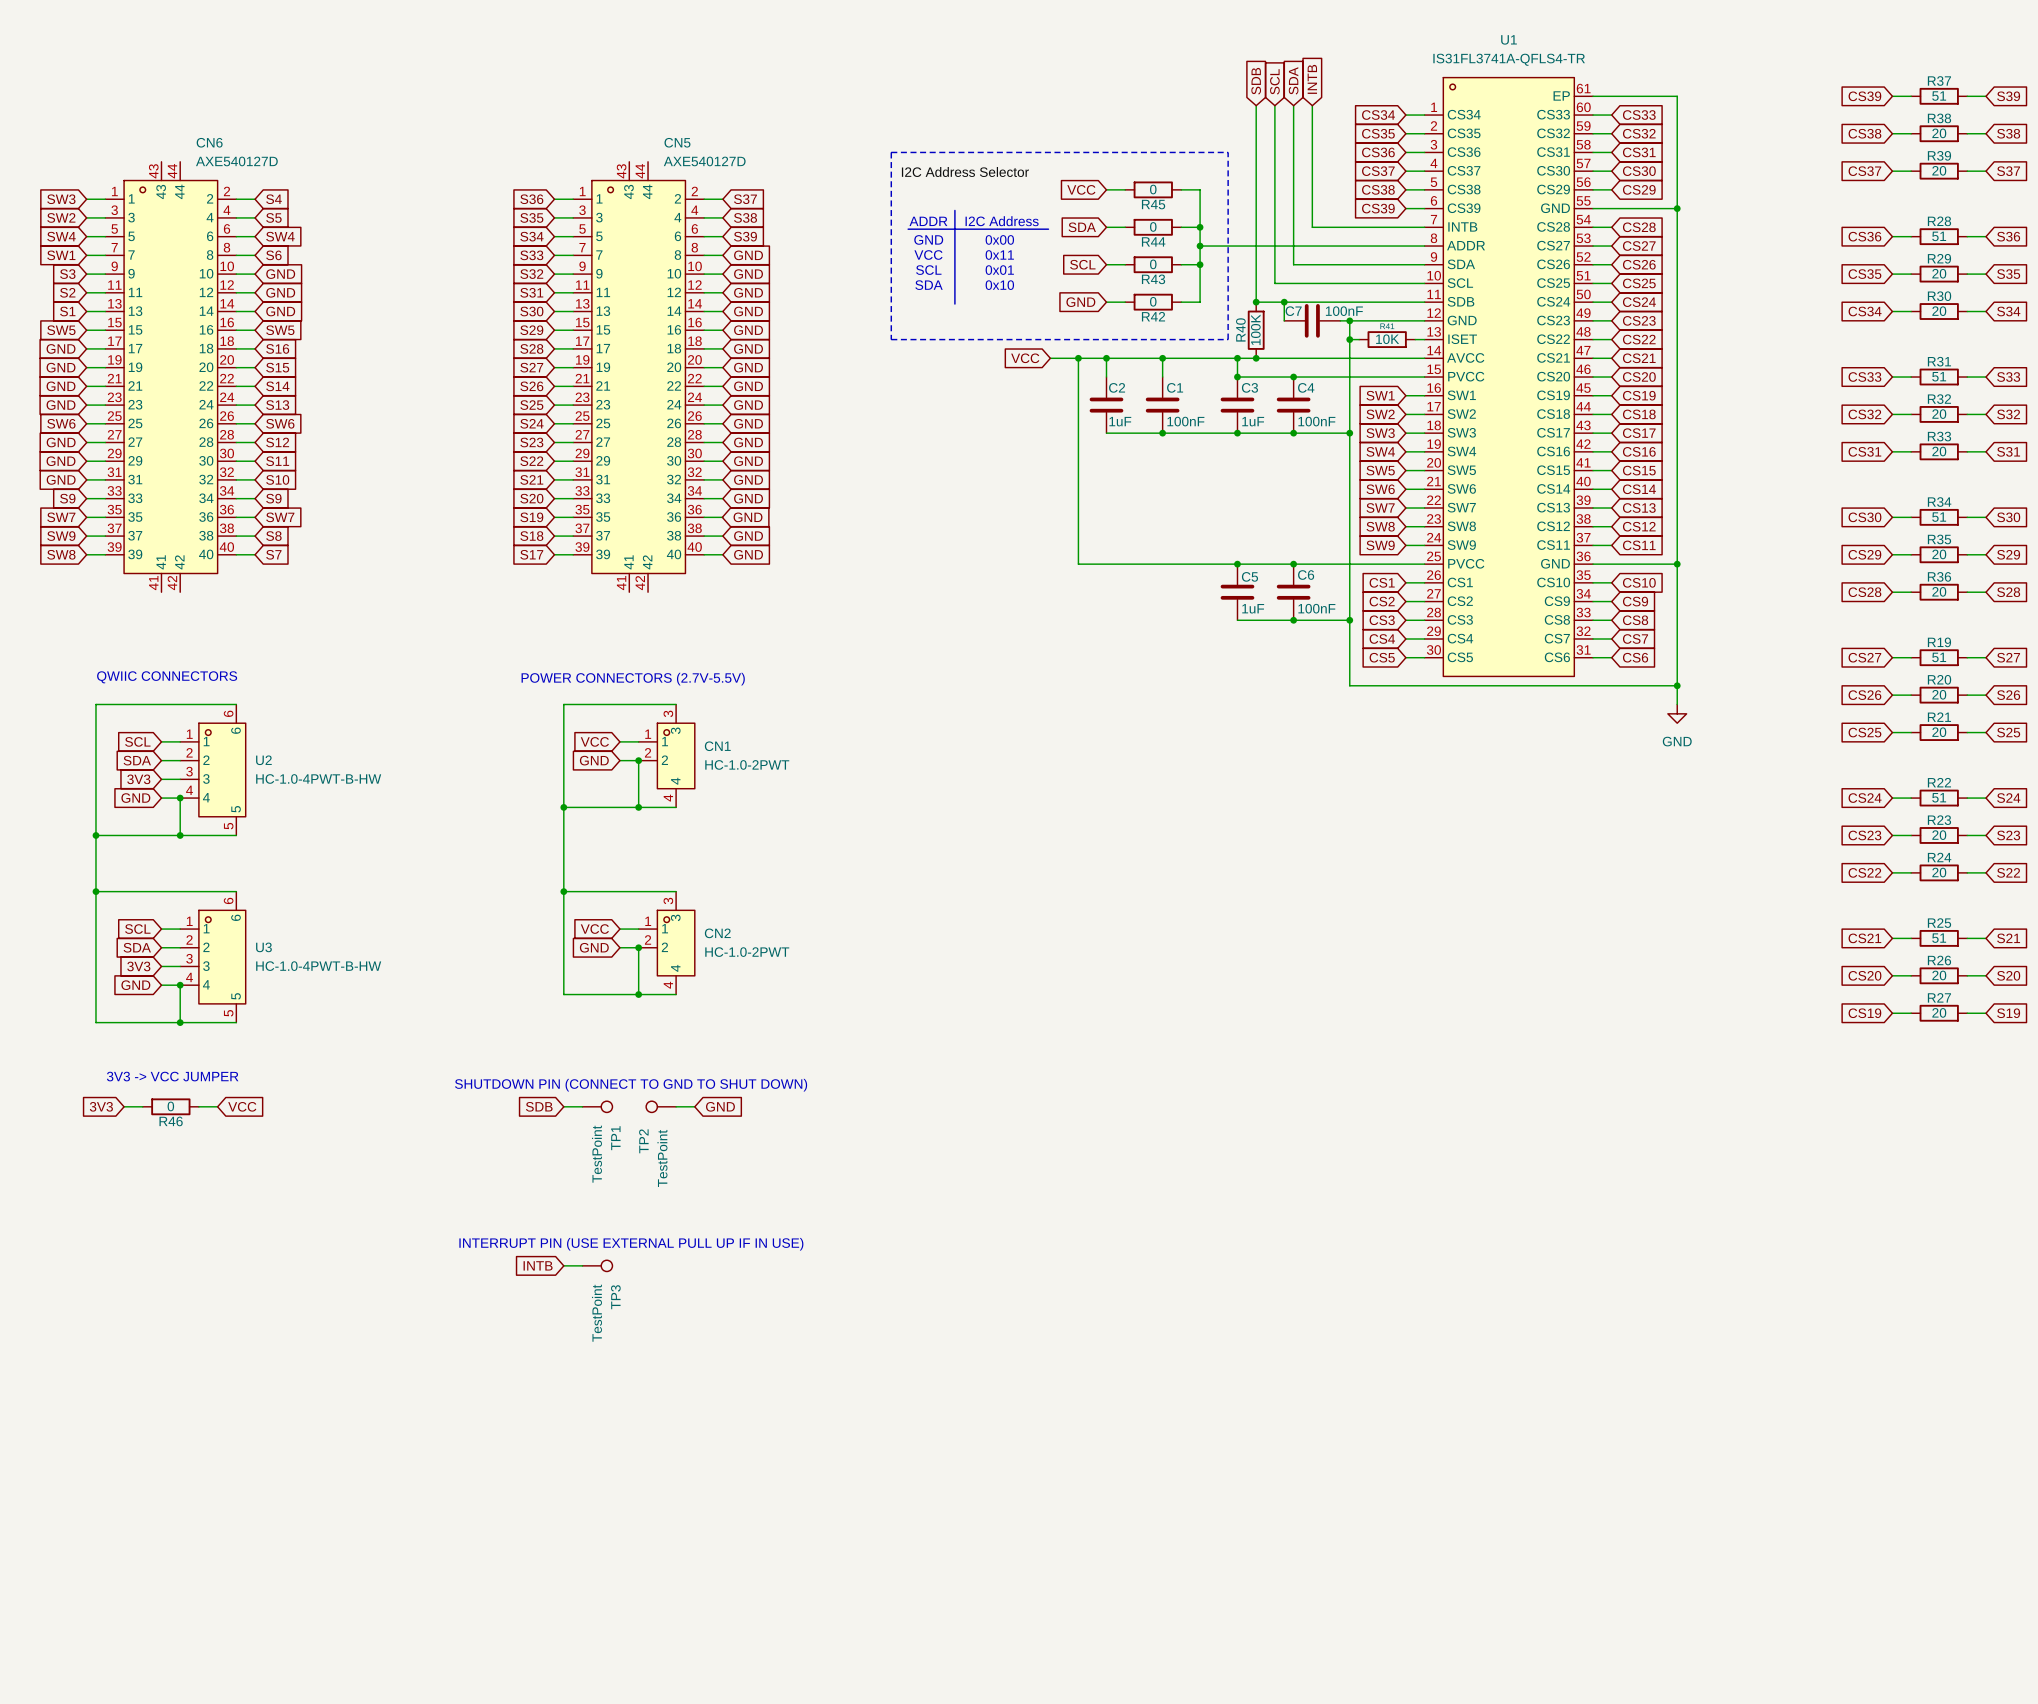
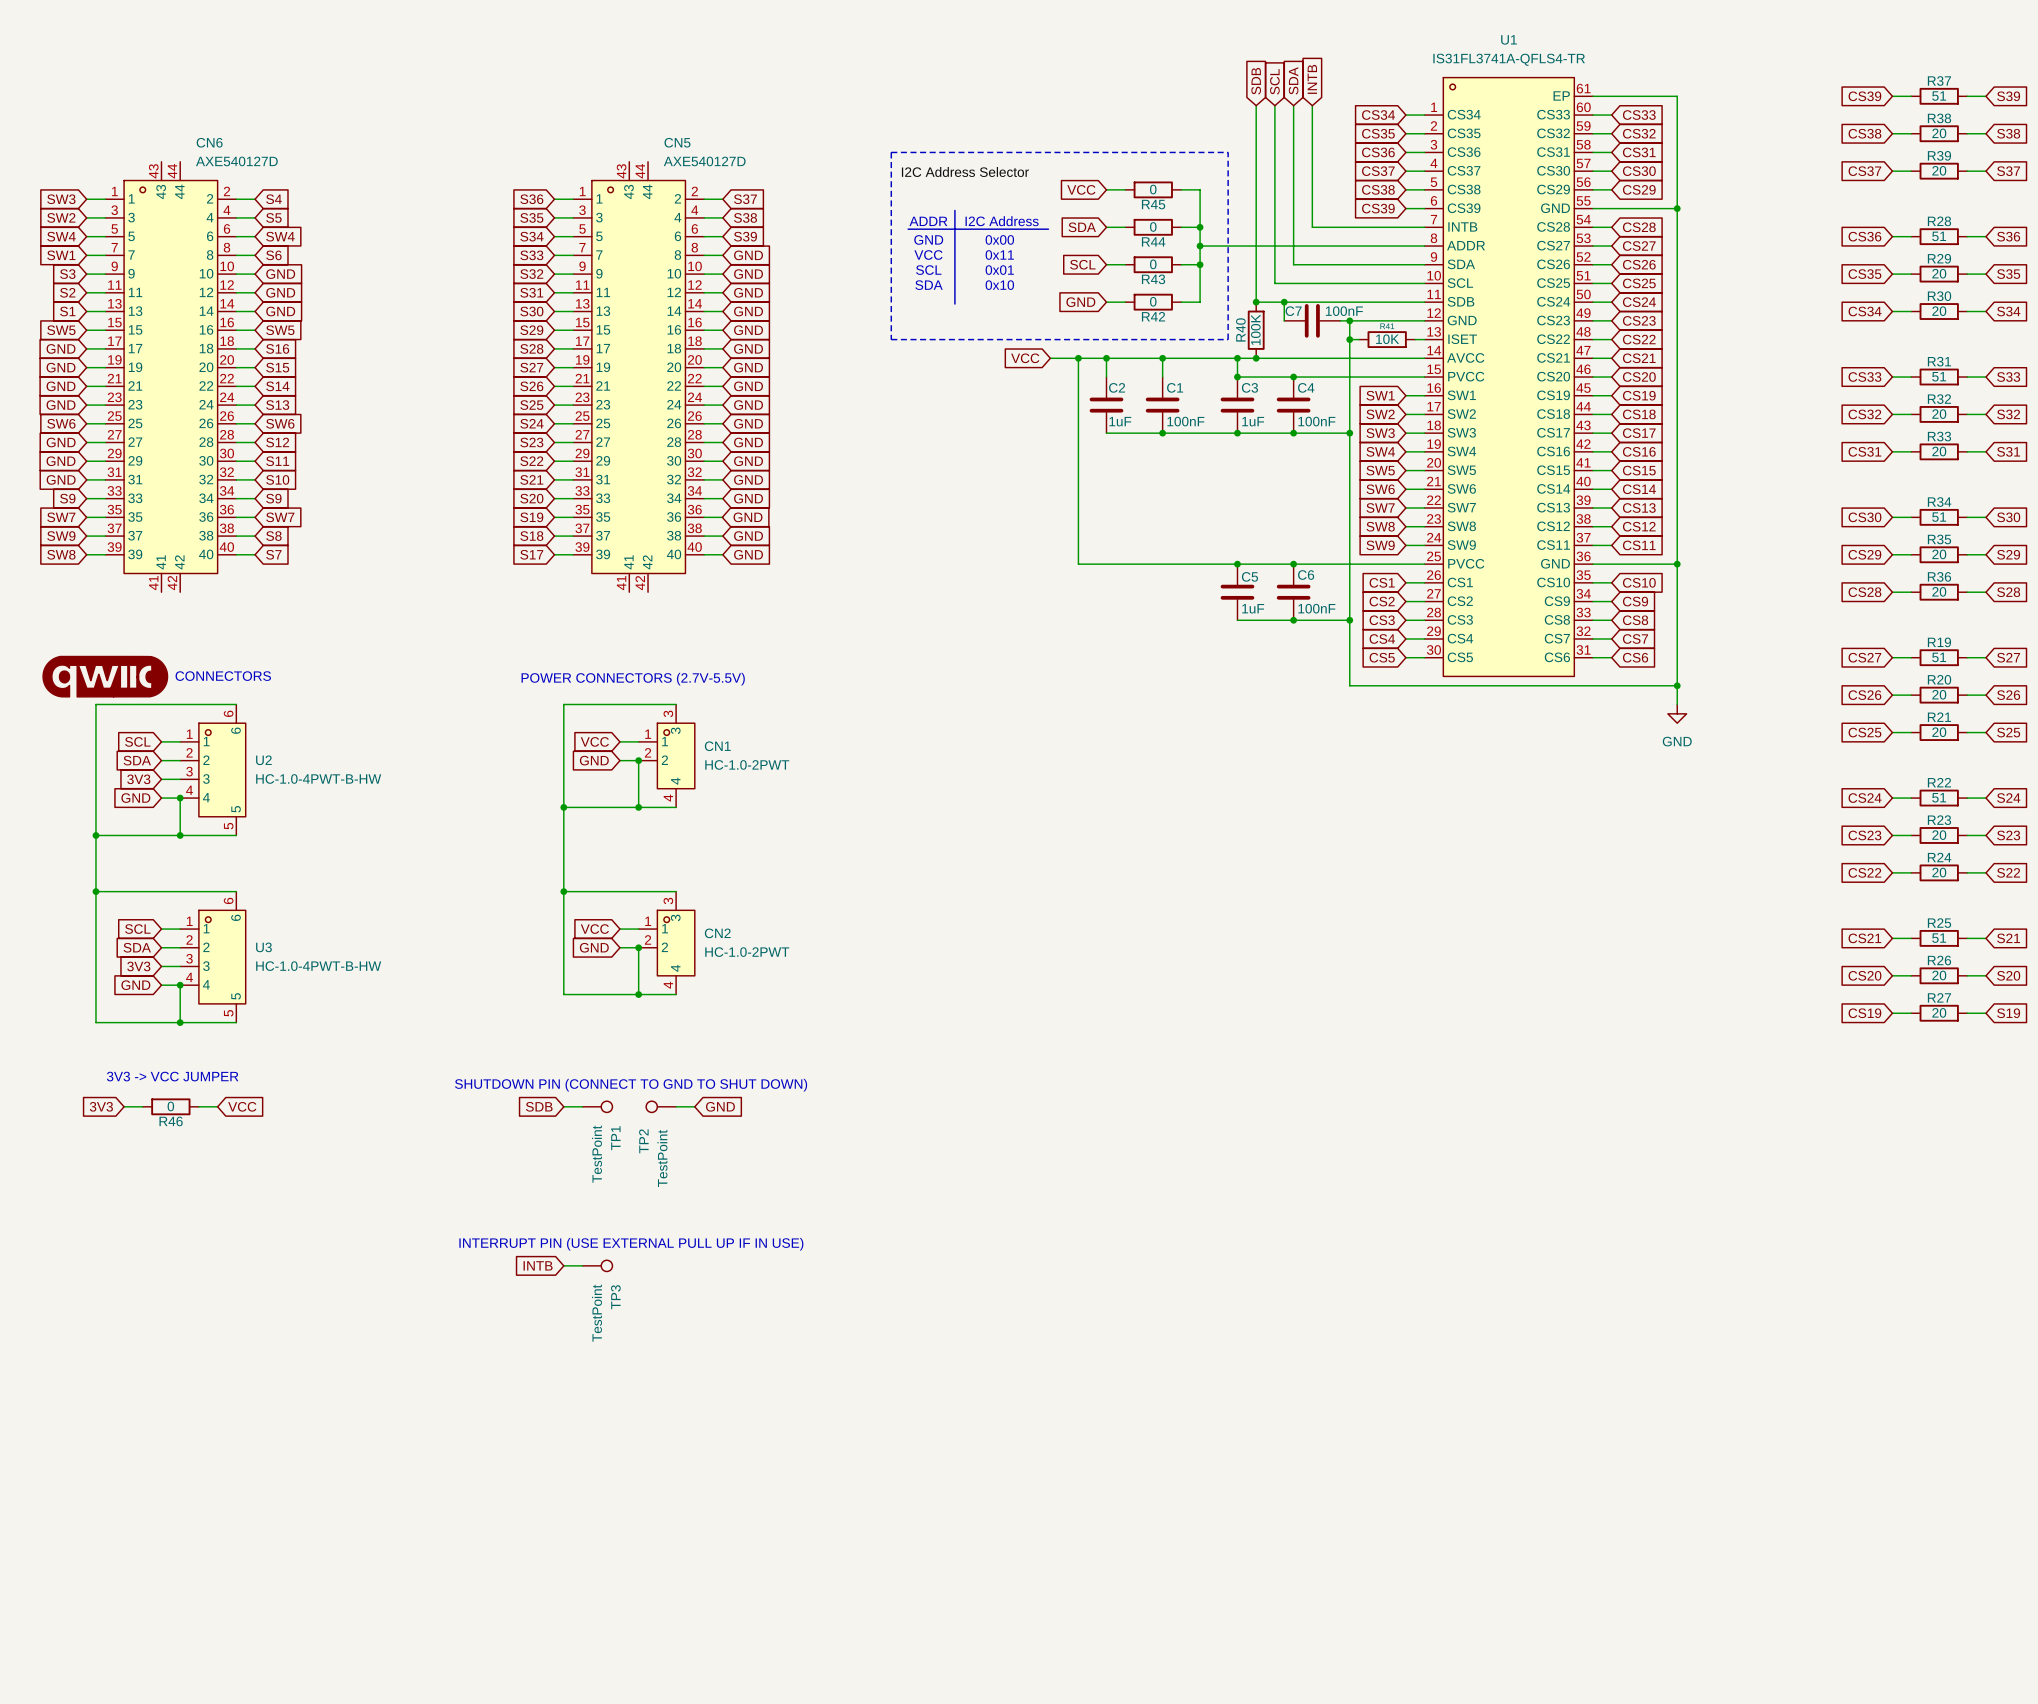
part: none -> (105, 676)
text: QWIIC CONNECTORS (167, 677) -> CONNECTORS (223, 676)

